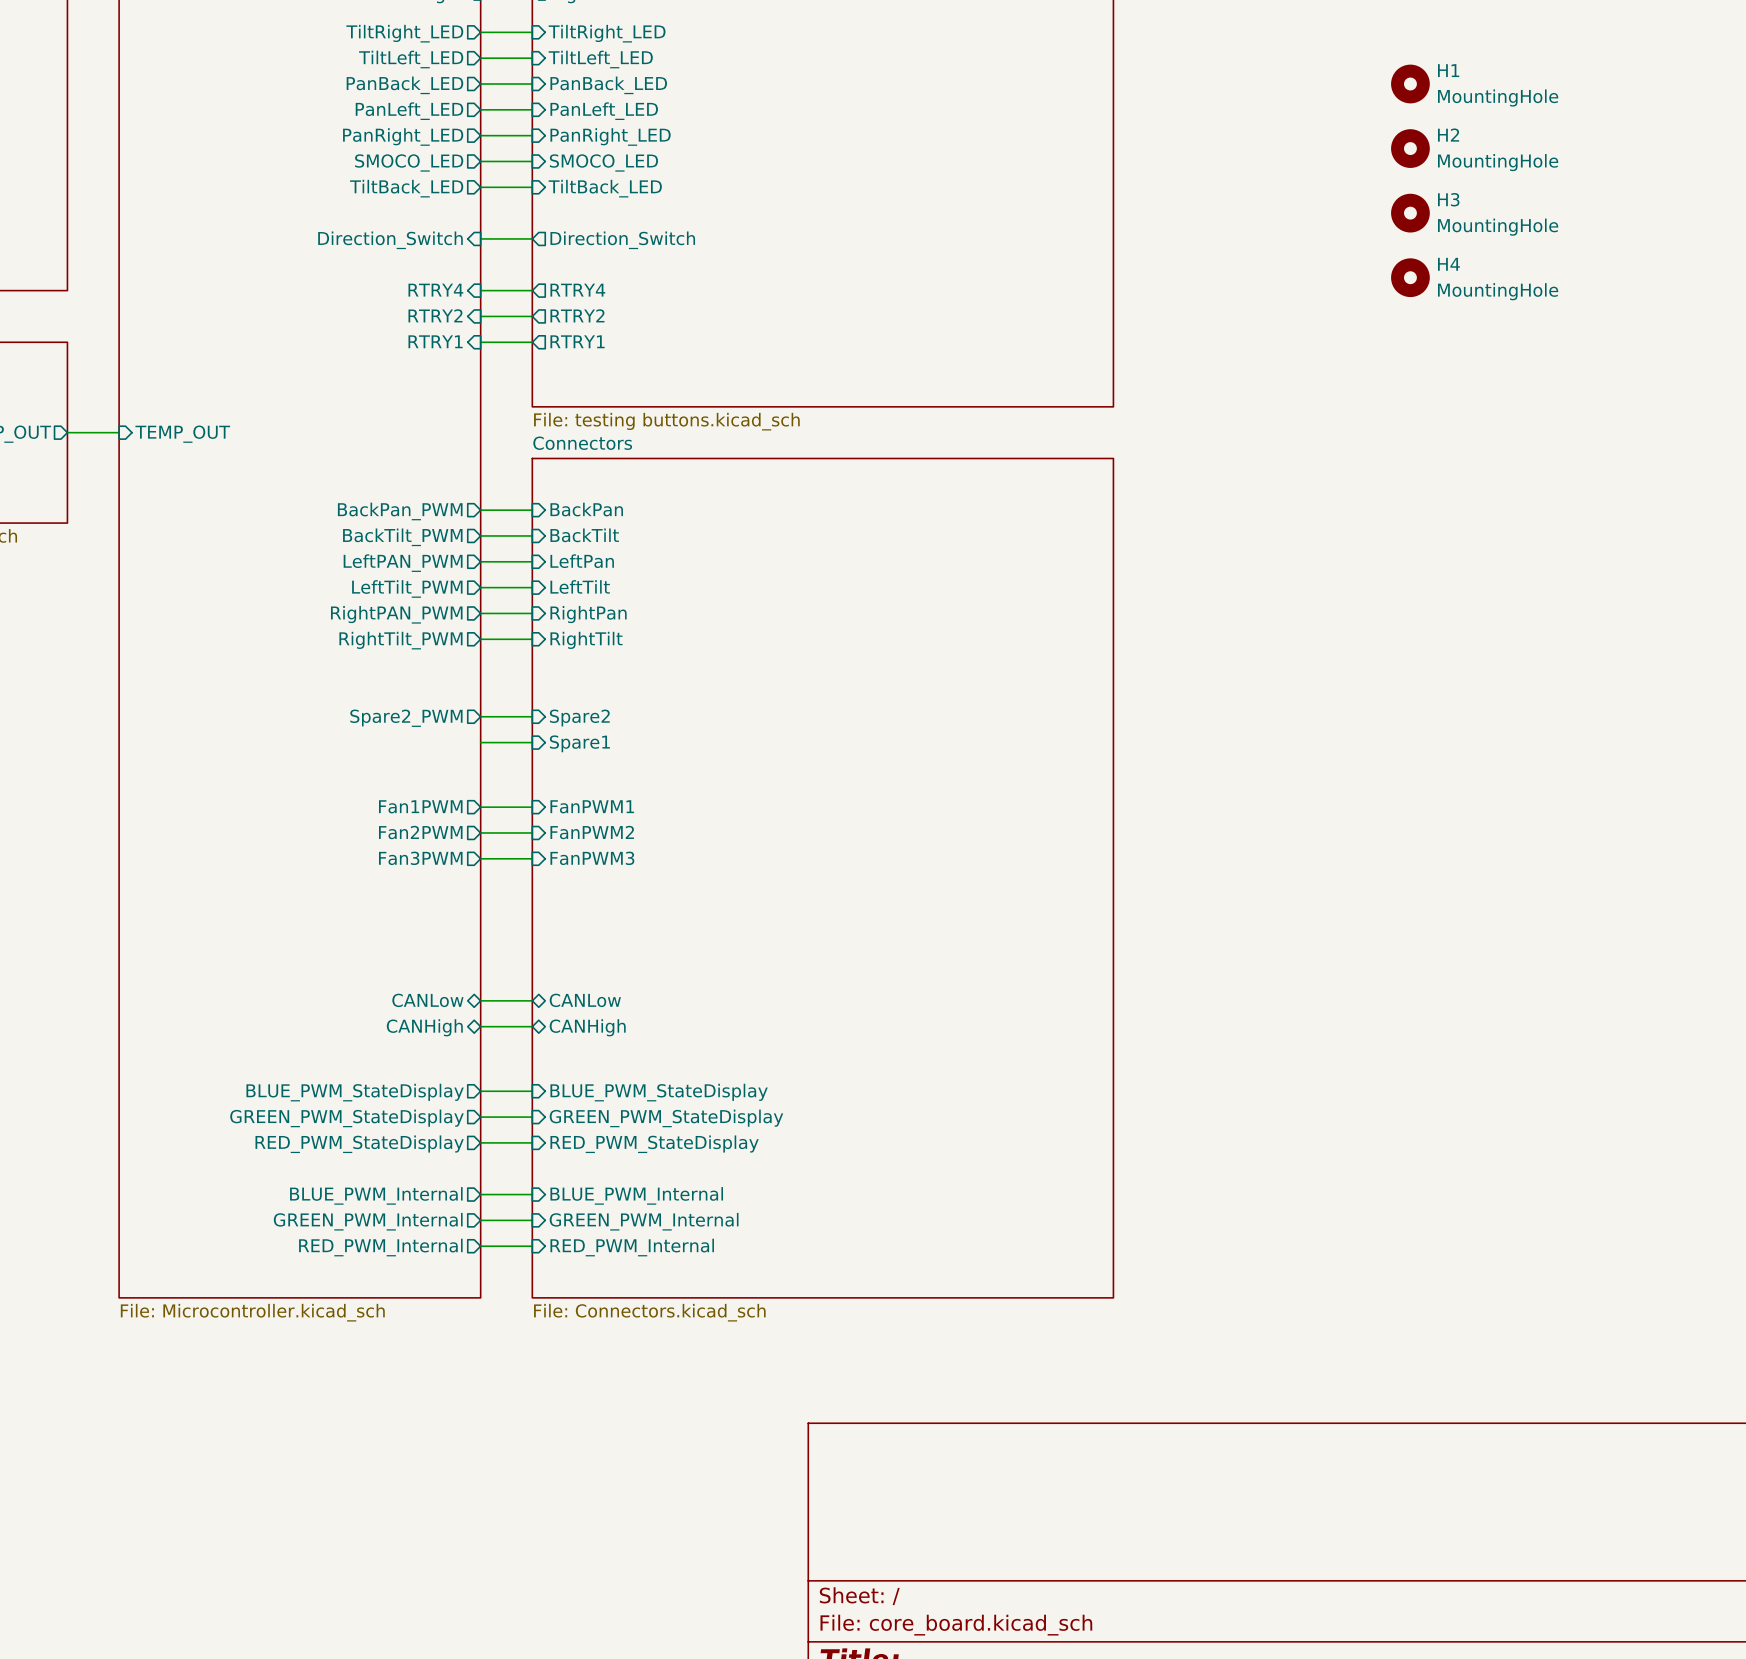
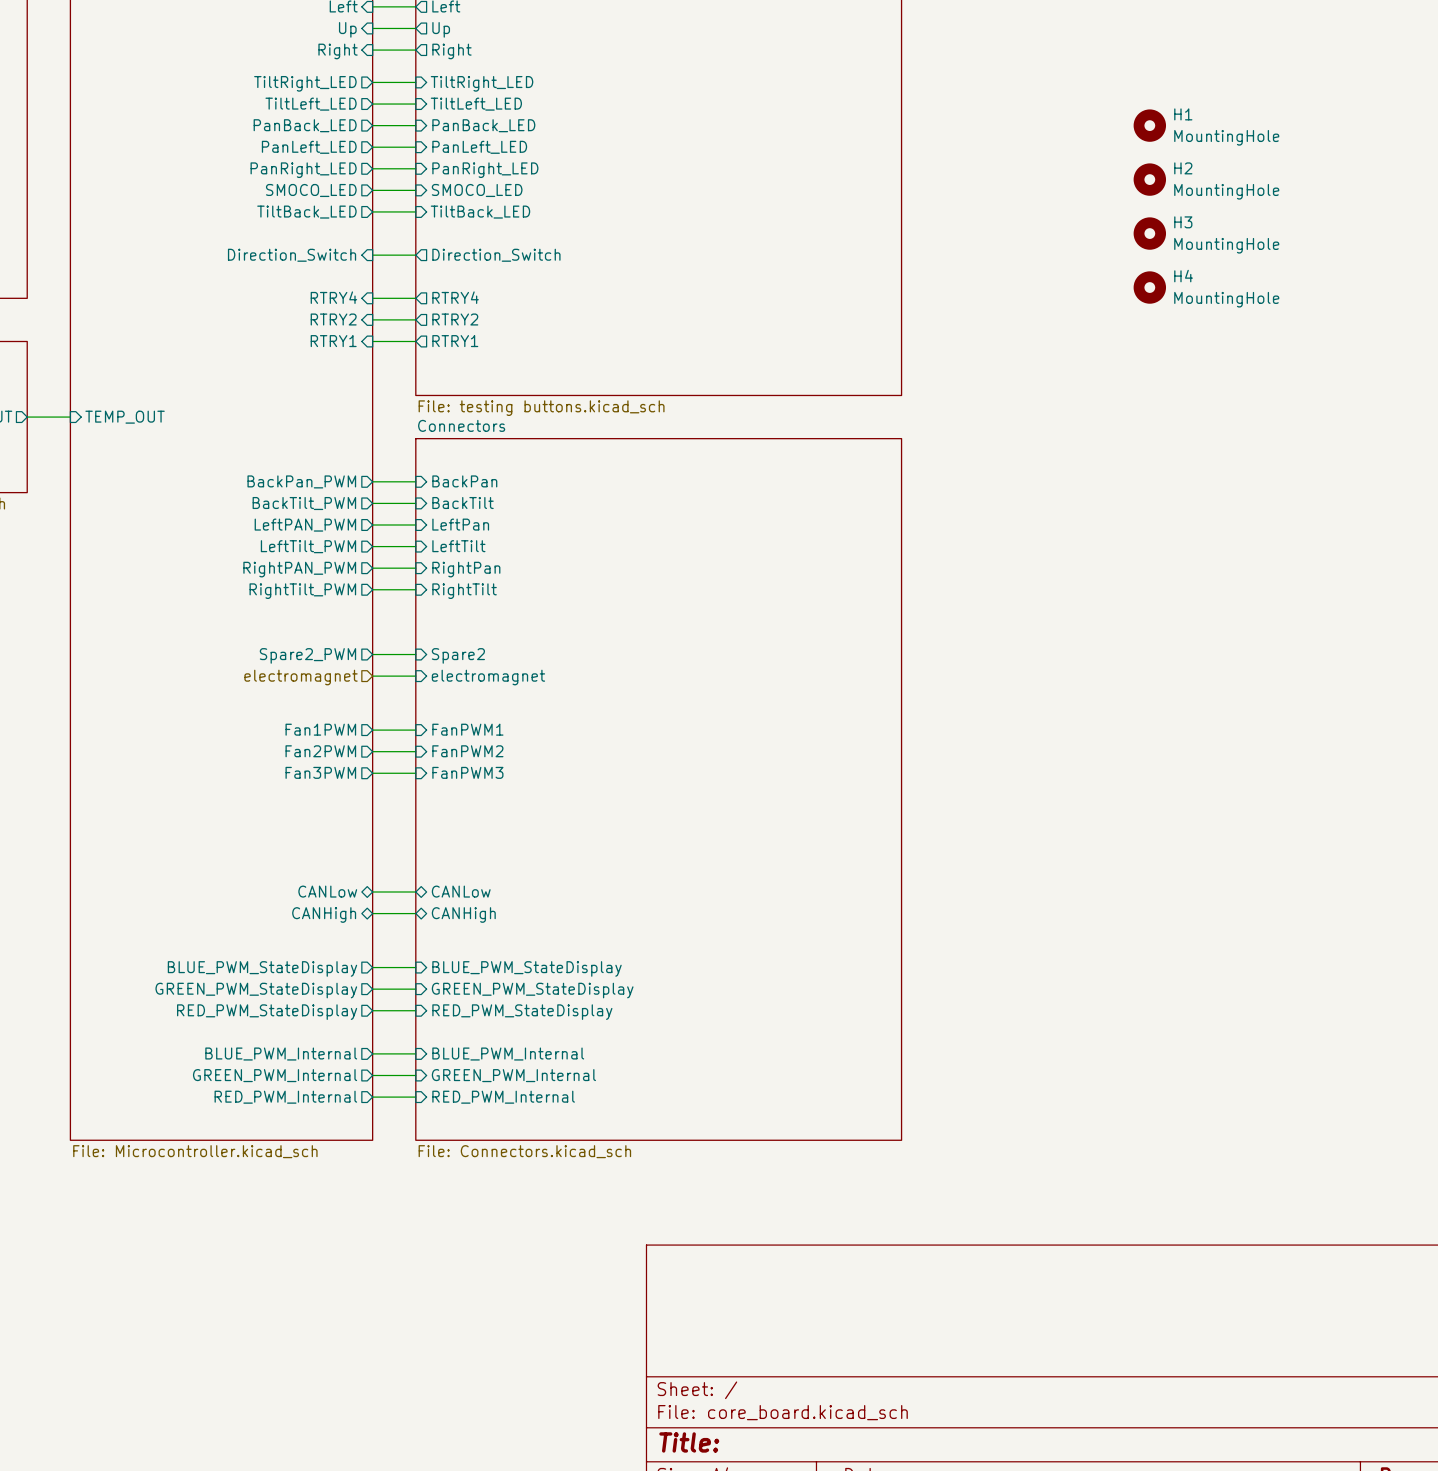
hierarchical label: none -> electromagnet (301, 677)
sheet pin: Spare1 (579, 743) -> electromagnet (488, 677)

